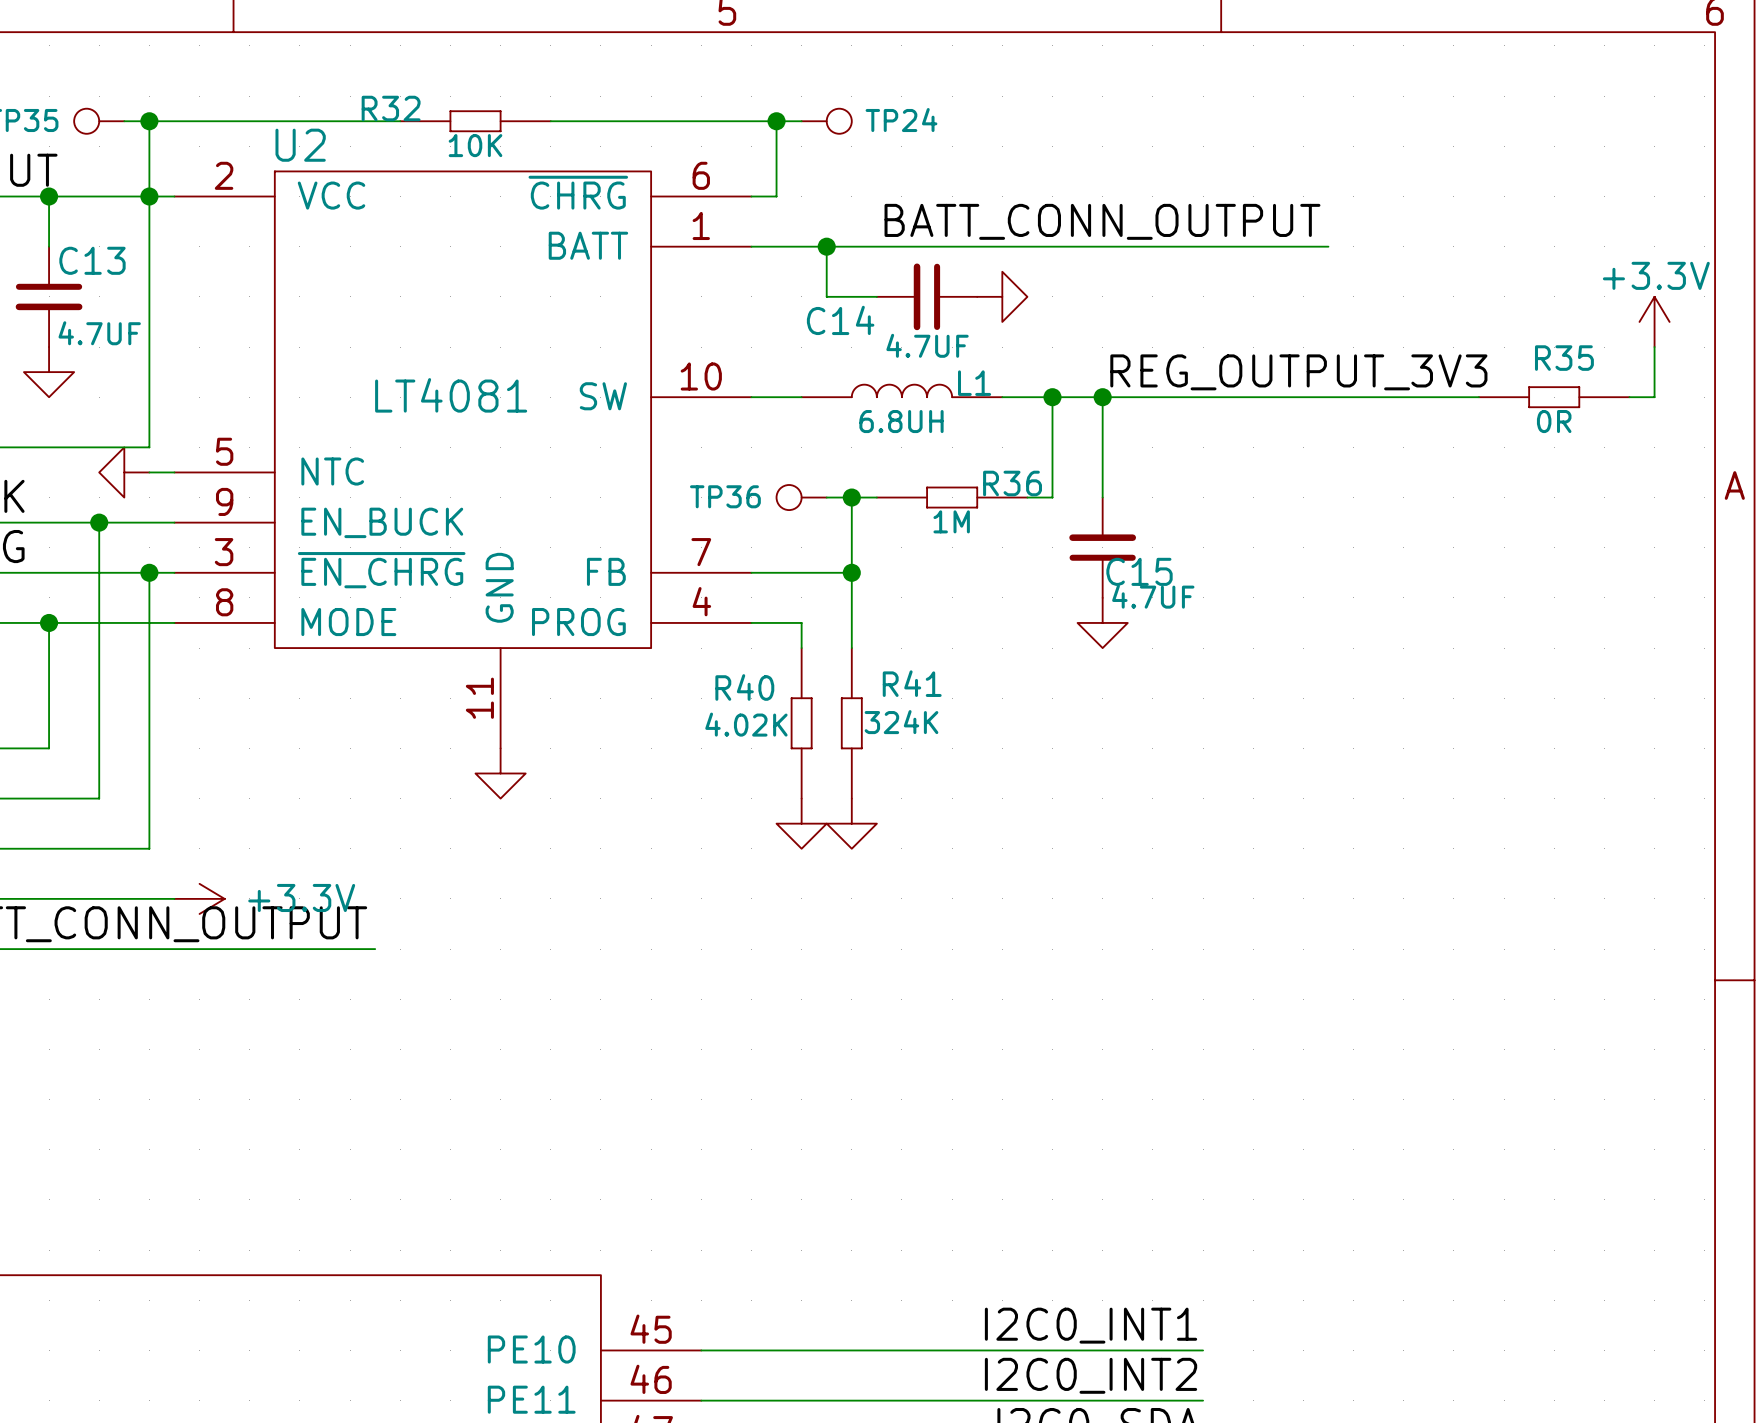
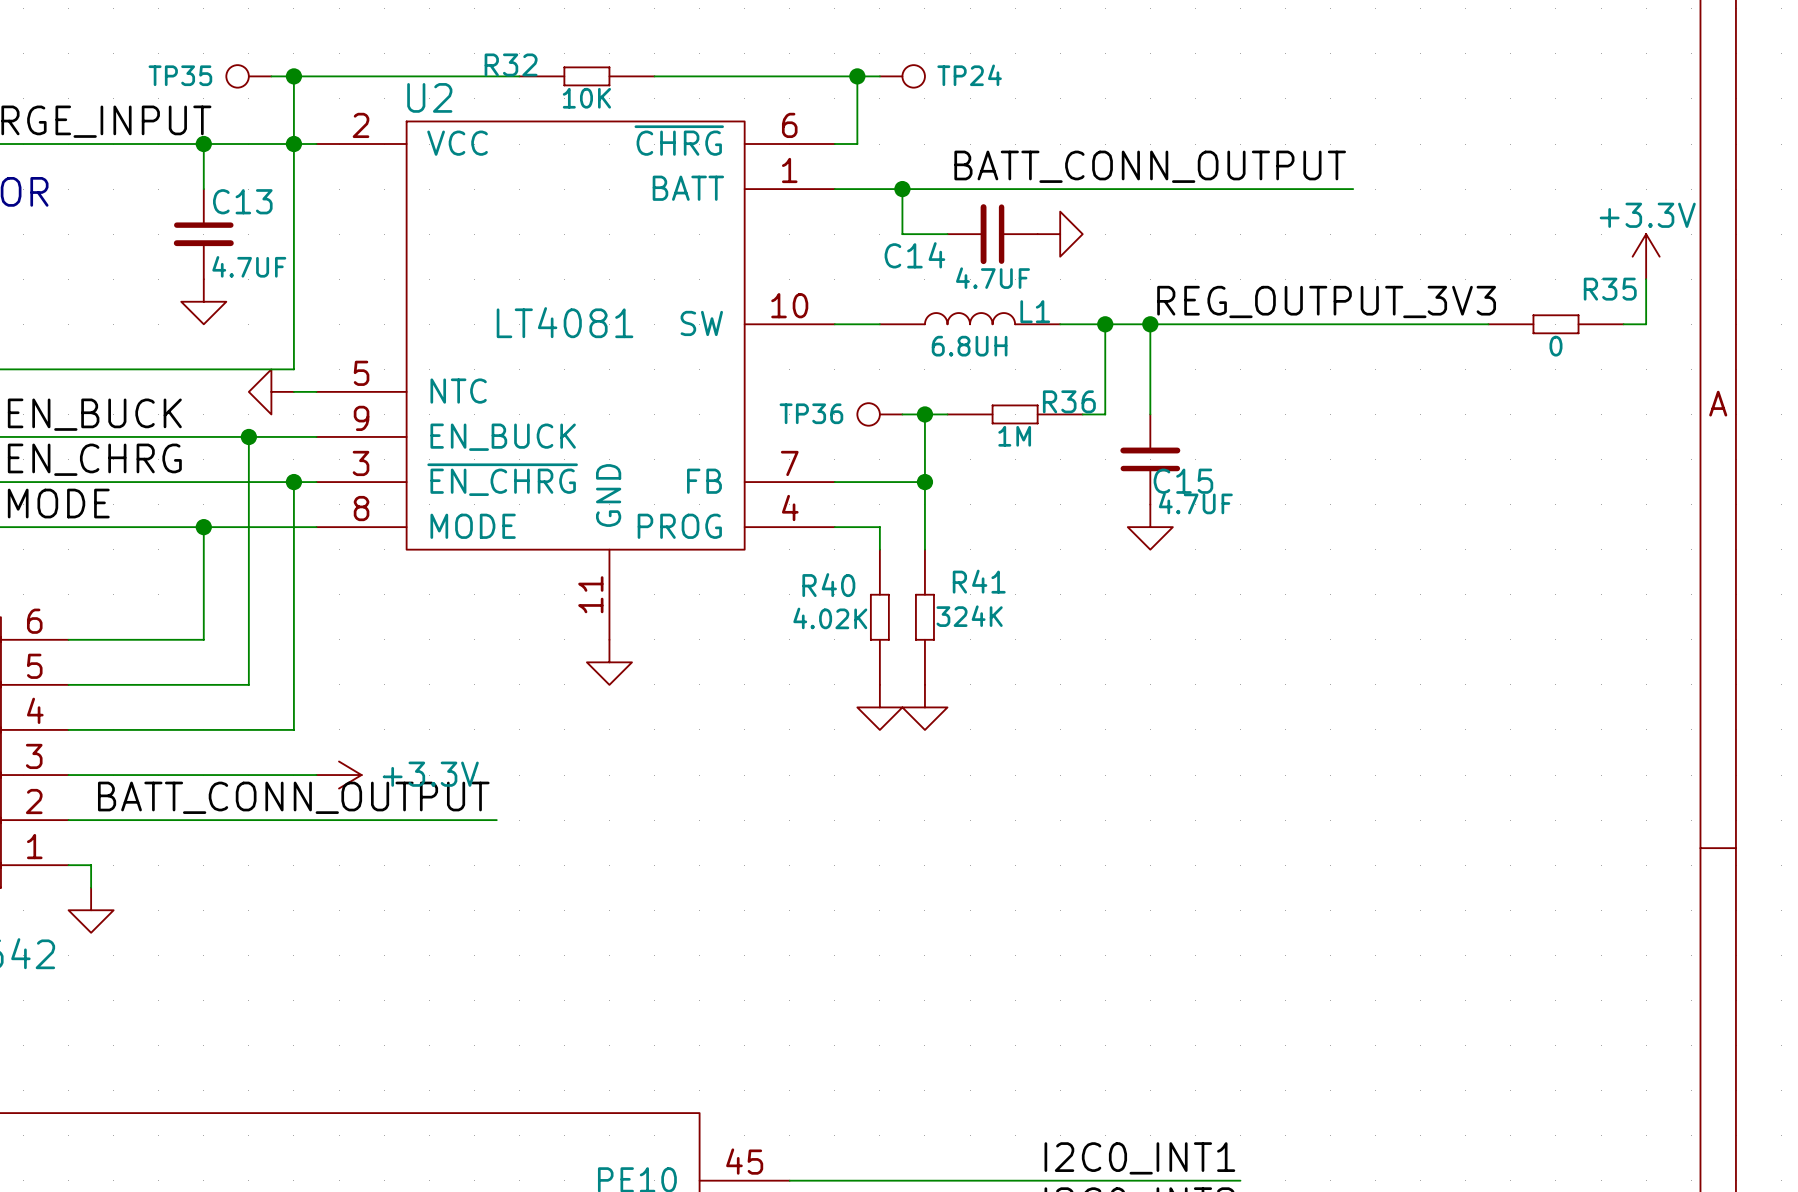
R35 name position: R35 (1564, 358) -> R35 (1610, 289)
R35 text: 0R (1554, 421) -> 0 (1555, 346)

